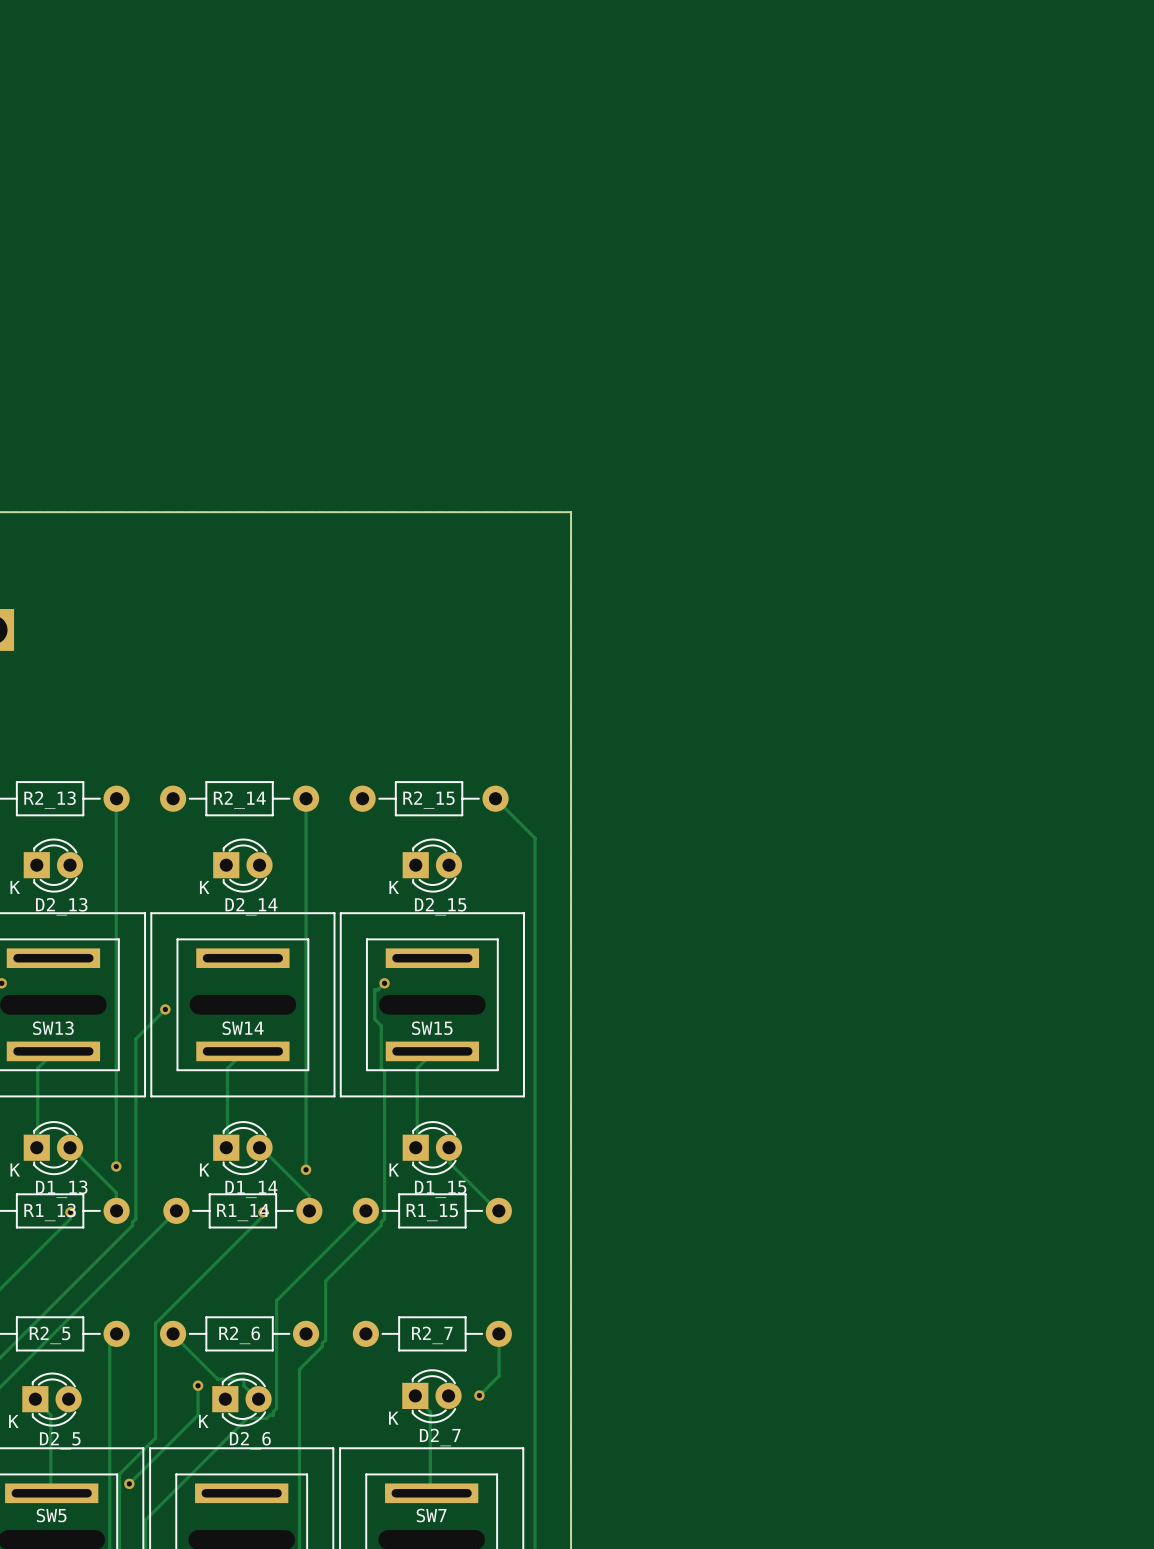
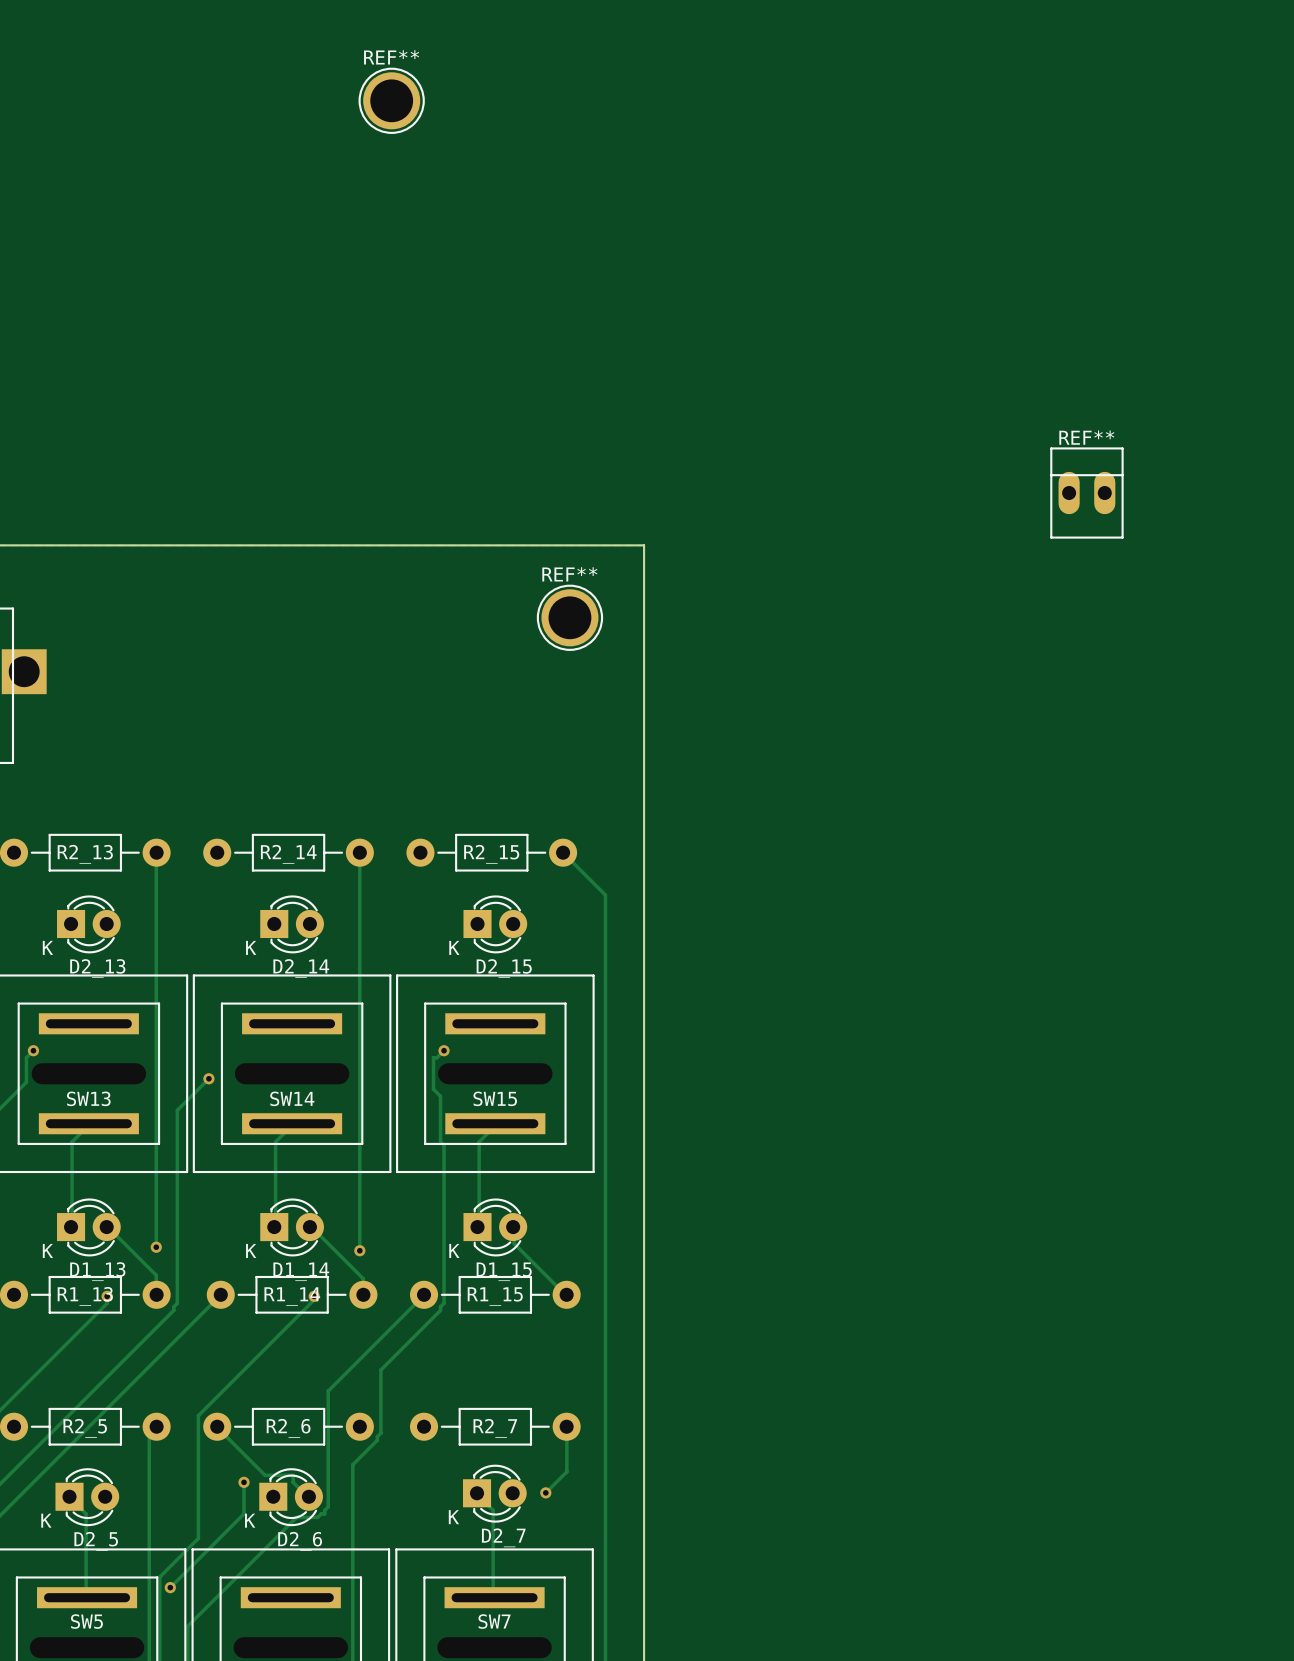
REF**: none -> (391, 100)
REF**: none -> (1086, 493)
REF**: none -> (569, 617)

